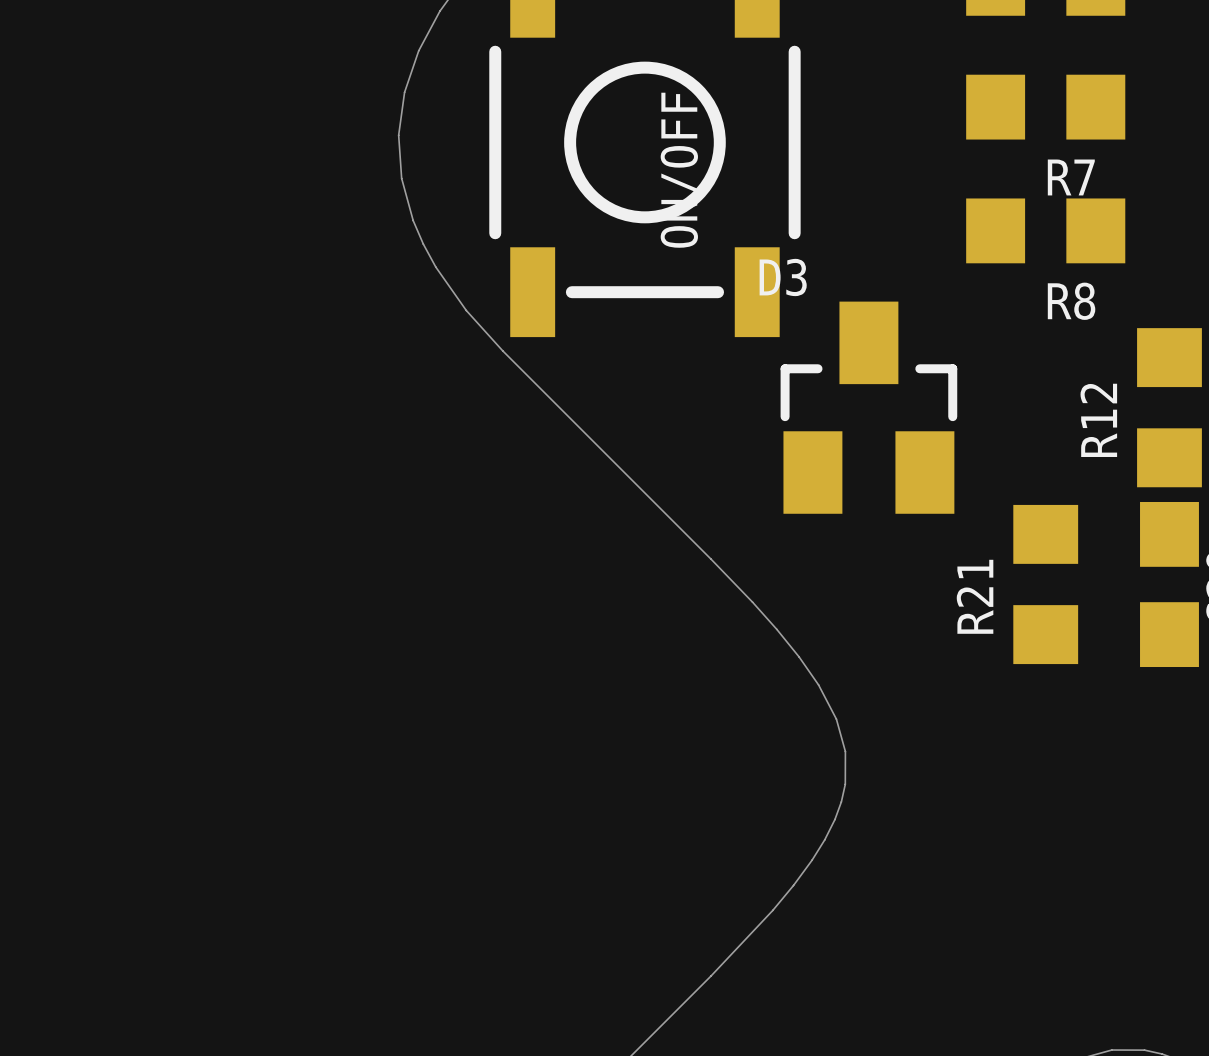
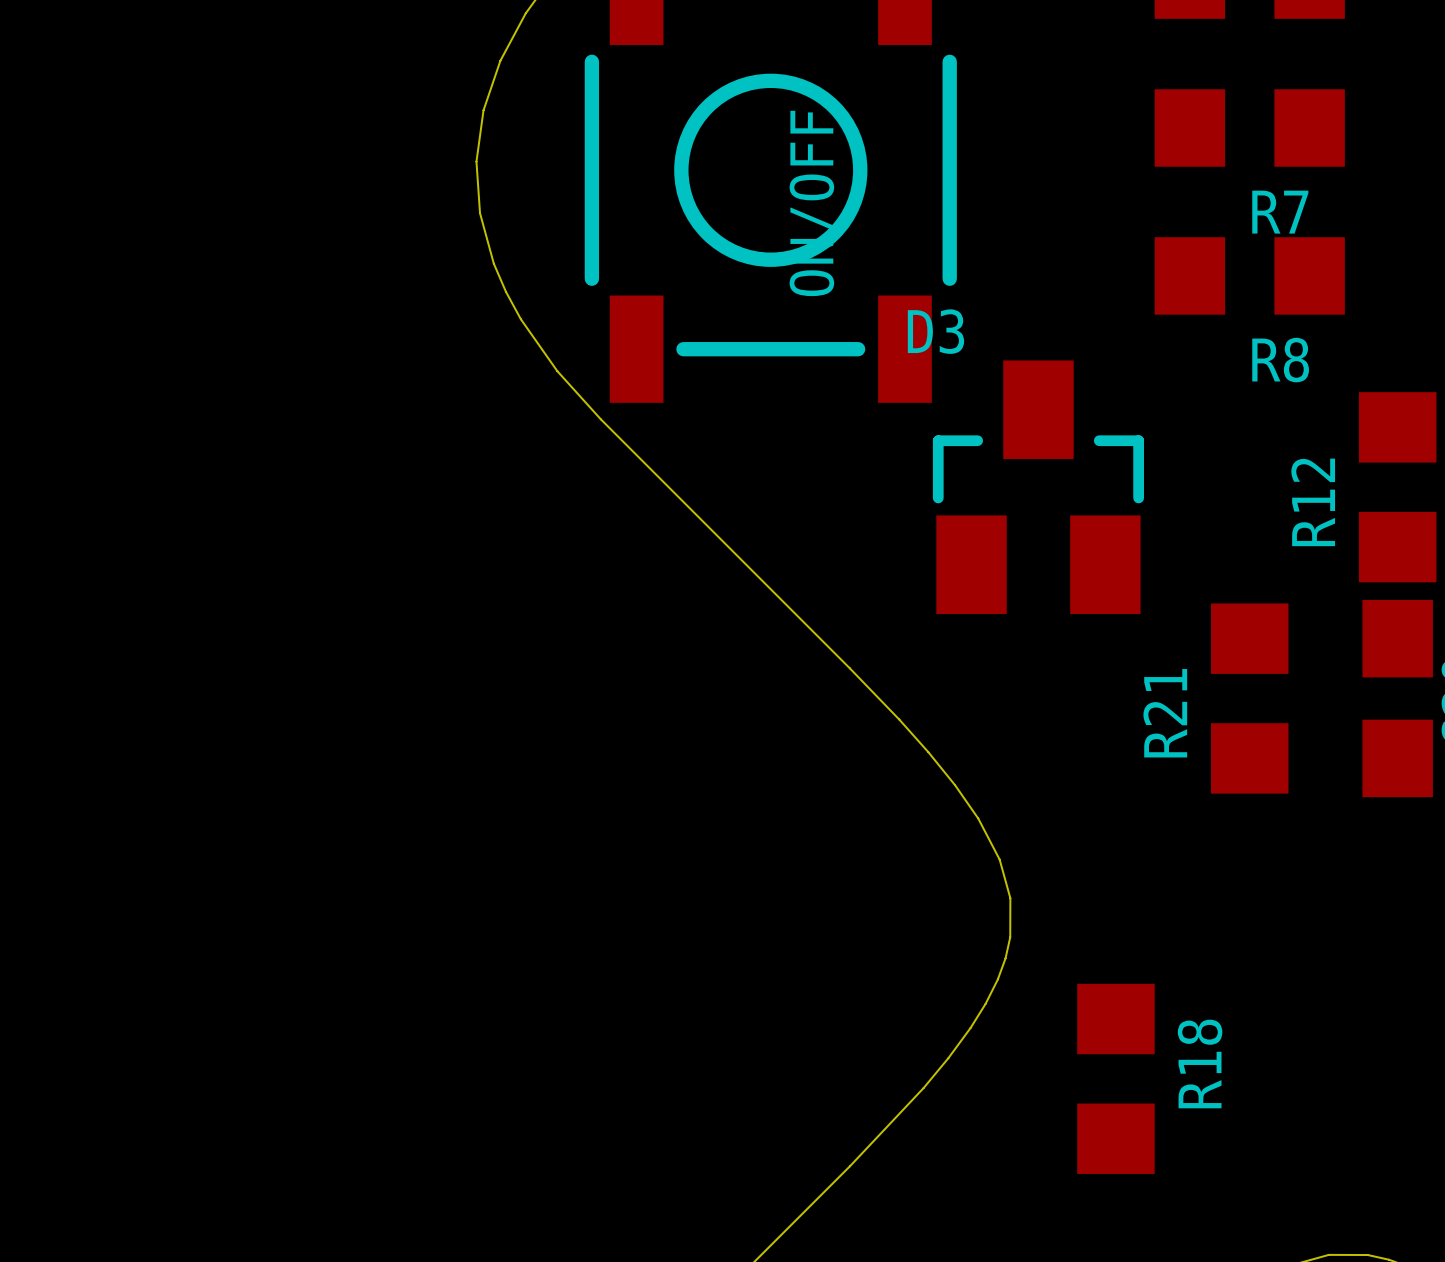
R18: none -> (1115, 1078)

